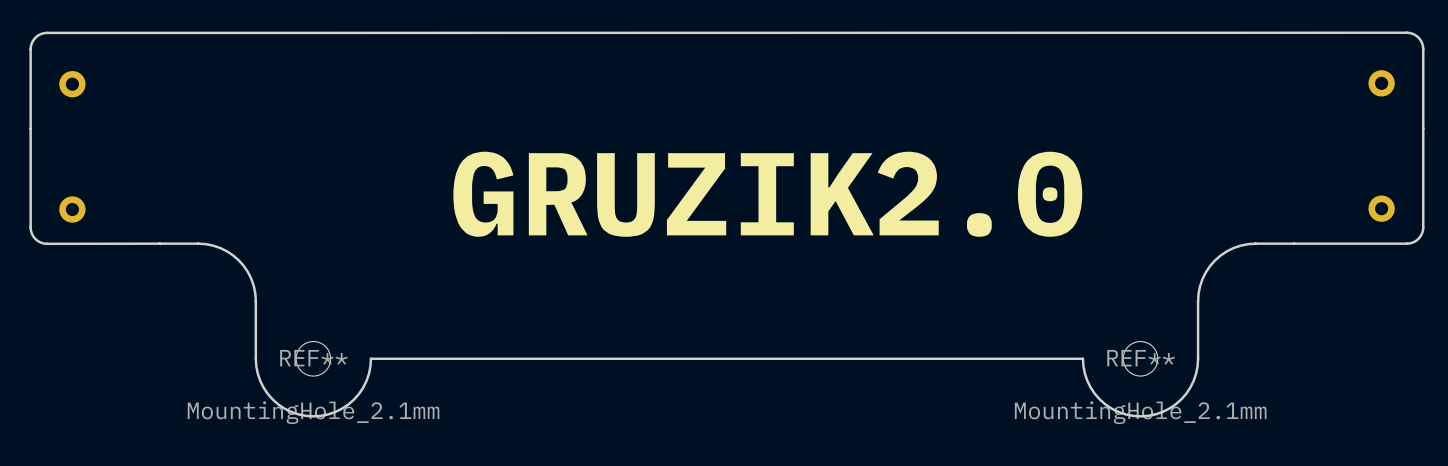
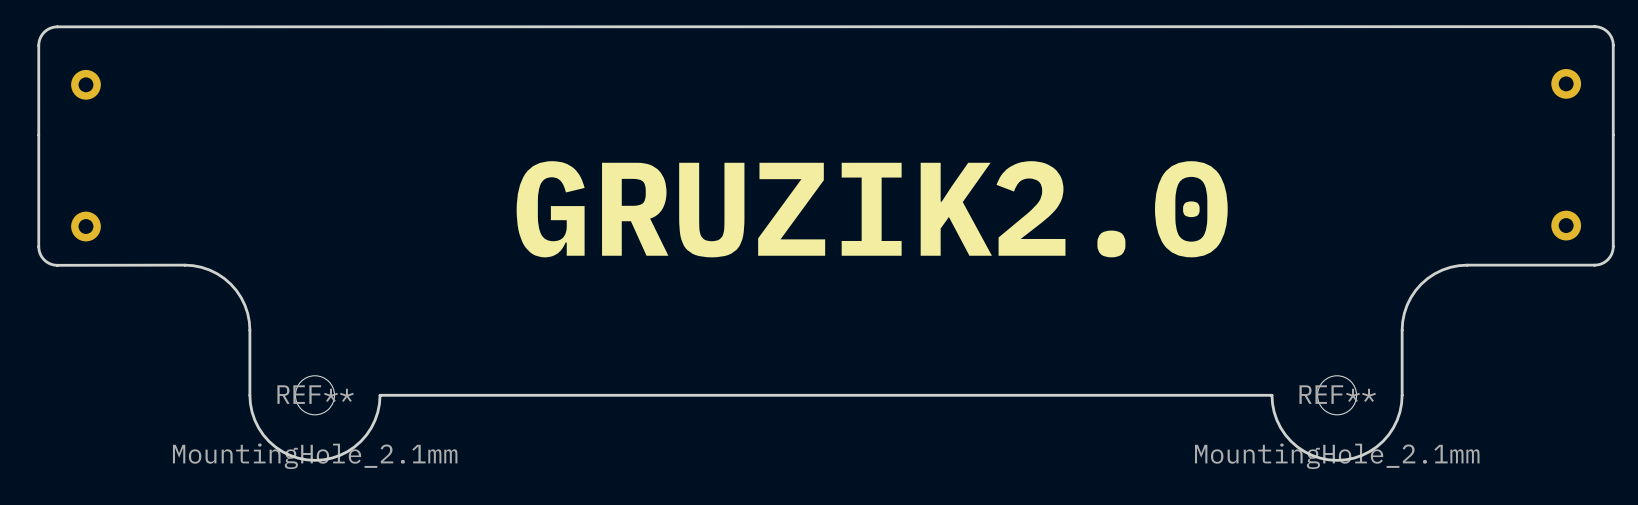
board edge: (159, 243) (213, 245) (227, 251) (243, 266) (251, 279) (255, 293) (255, 358) (257, 373) (267, 393) (284, 408) (298, 414) (313, 416) (328, 414) (342, 408) (354, 399) (363, 387) (368, 373) (370, 358) -> (184, 265) (201, 267) (217, 273) (230, 284) (241, 297) (249, 321) (249, 395) (252, 412) (263, 434) (282, 451) (298, 458) (314, 460) (339, 455) (354, 446) (371, 427) (377, 412) (380, 395) (423, 395)
board edge: (1294, 243) (1240, 245) (1226, 251) (1209, 266) (1202, 279) (1198, 293) (1198, 358) (1196, 373) (1186, 393) (1169, 408) (1155, 414) (1140, 416) (1125, 414) (1111, 408) (1099, 399) (1090, 387) (1084, 373) (1082, 358) -> (1467, 265) (1450, 267) (1434, 273) (1421, 284) (1410, 297) (1402, 321) (1402, 395) (1399, 412) (1388, 434) (1369, 451) (1353, 458) (1337, 460) (1312, 455) (1297, 446) (1285, 434) (1276, 420) (1271, 395) (1228, 395)
REF** position: (313, 358) -> (314, 395)
REF** position: (1140, 358) -> (1337, 395)

